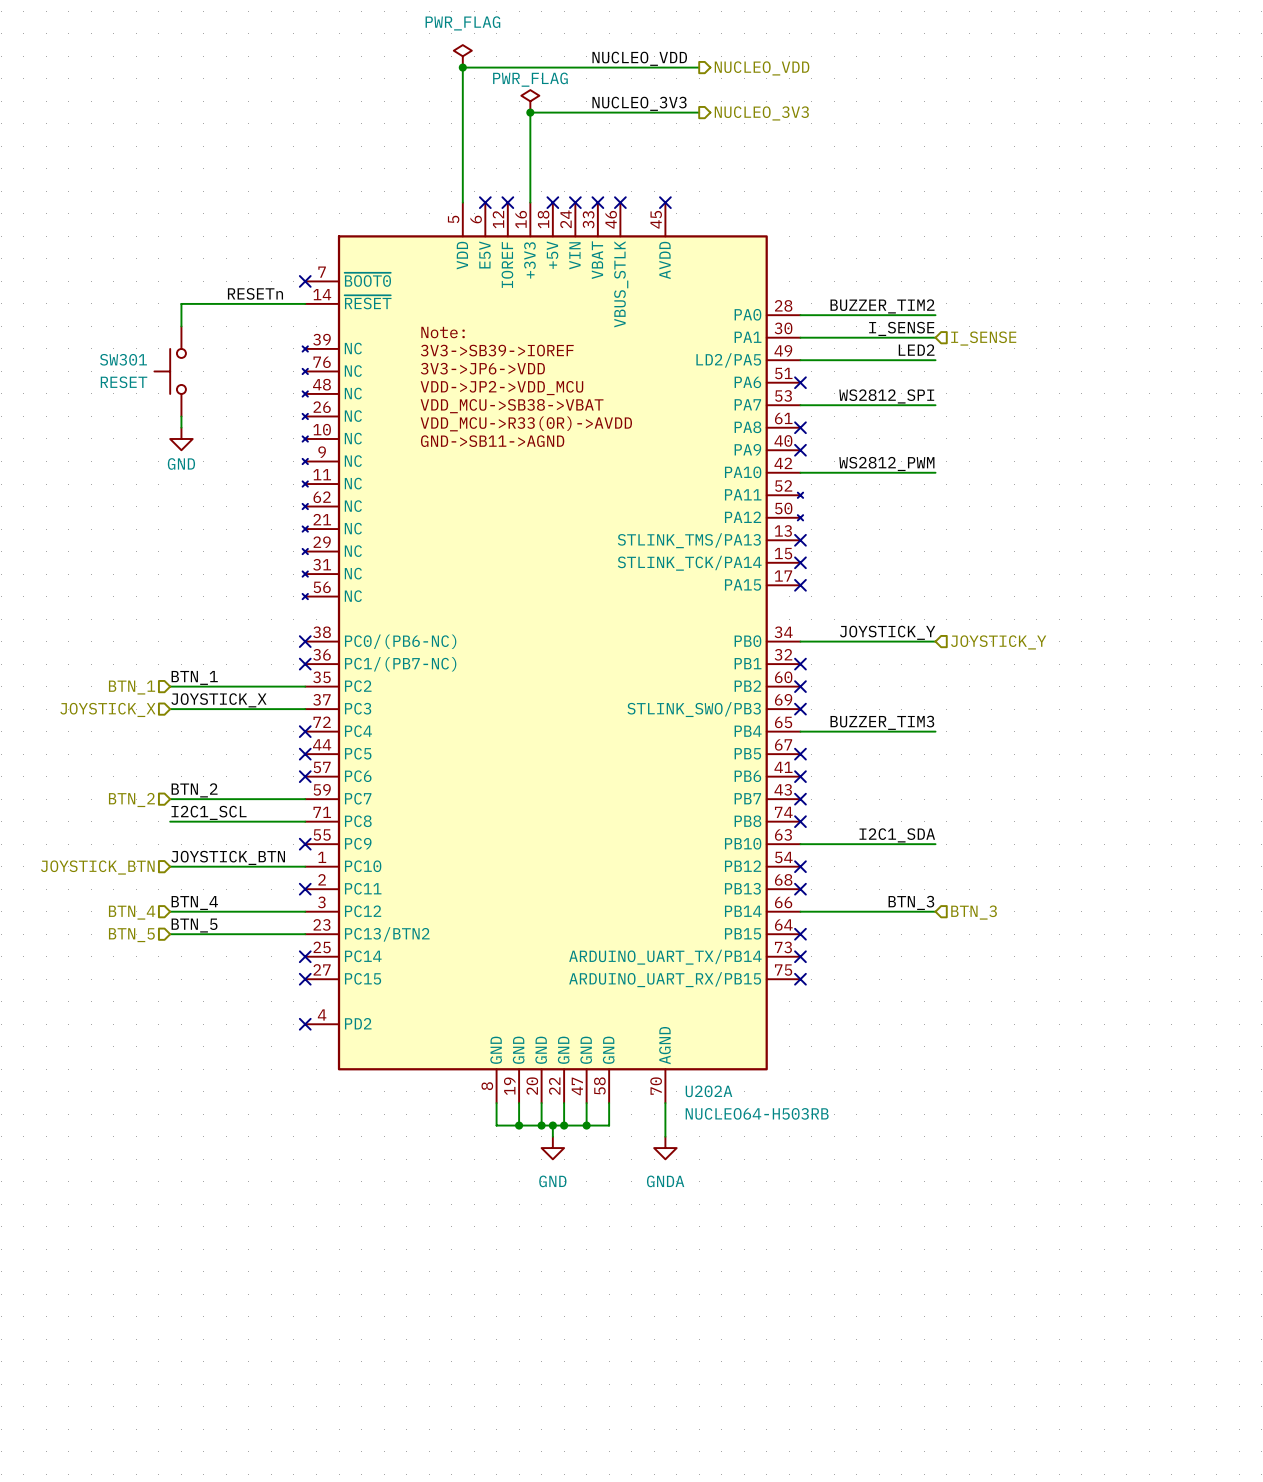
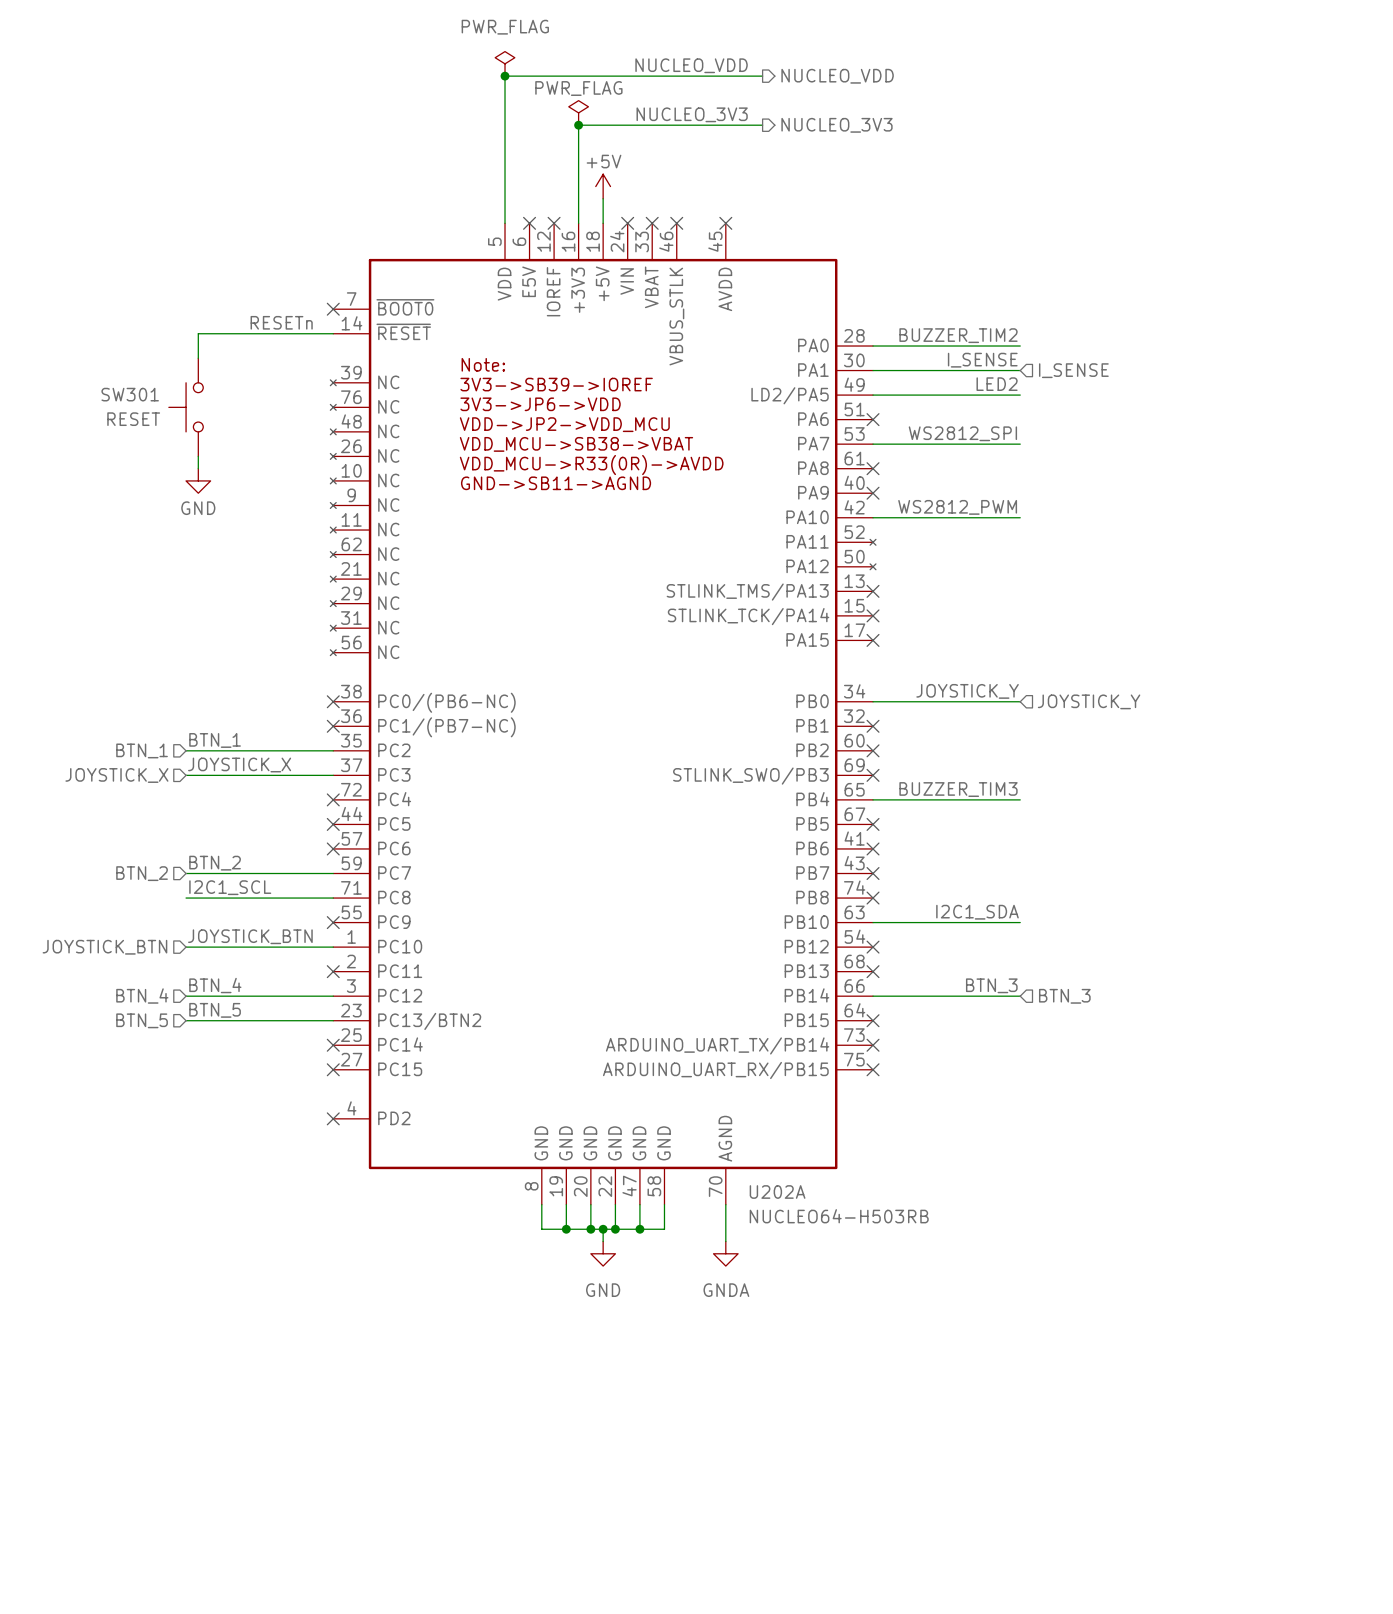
power symbol: none -> +5V (603, 186)
wire: none -> (603, 198) (603, 223)
no-connect mark: (552, 202) -> none

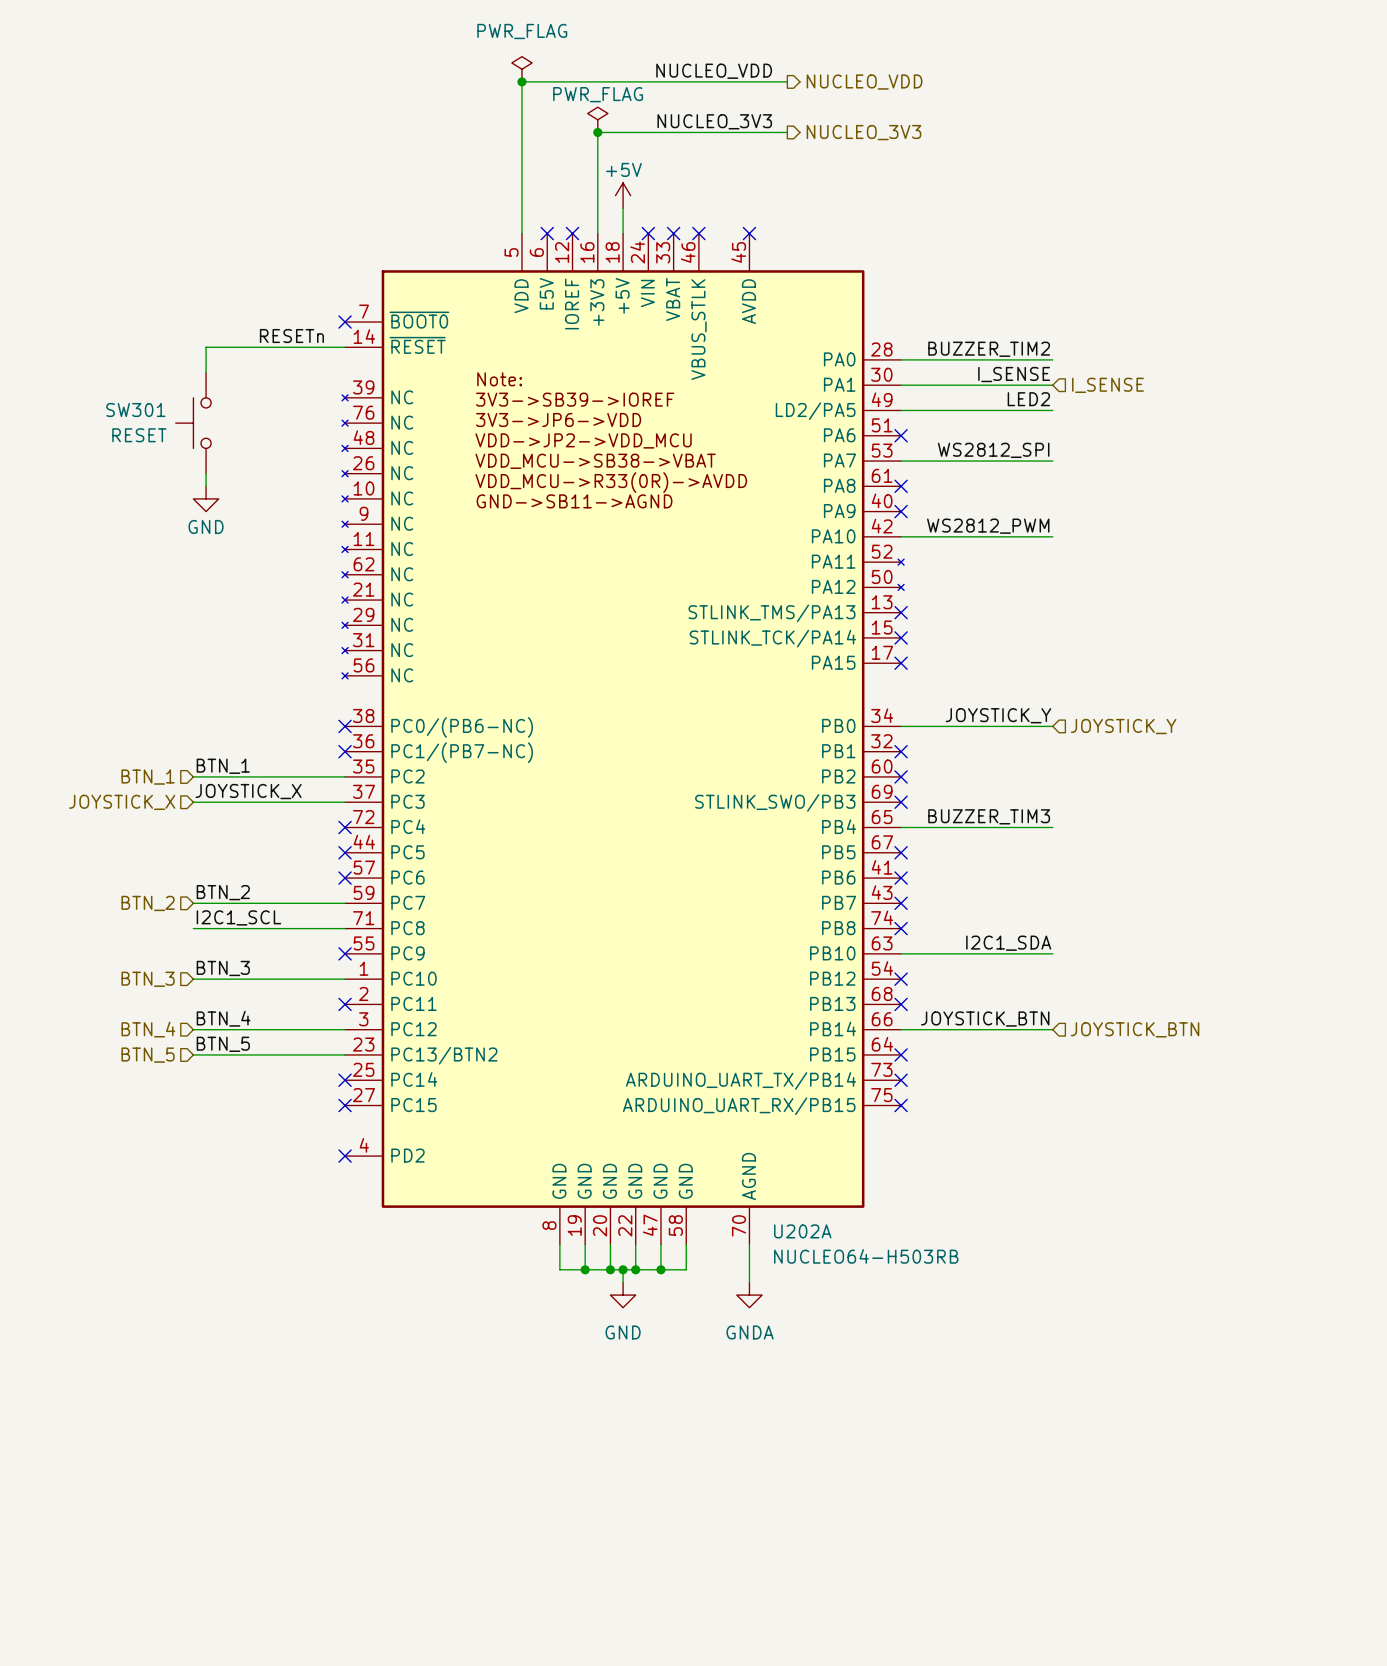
label: JOYSTICK_BTN (250, 936) -> BTN_3 (223, 968)
hierarchical label: JOYSTICK_BTN (104, 947) -> BTN_3 (148, 979)
label: BTN_3 (991, 985) -> JOYSTICK_BTN (985, 1019)
hierarchical label: BTN_3 (1064, 996) -> JOYSTICK_BTN (1135, 1029)

